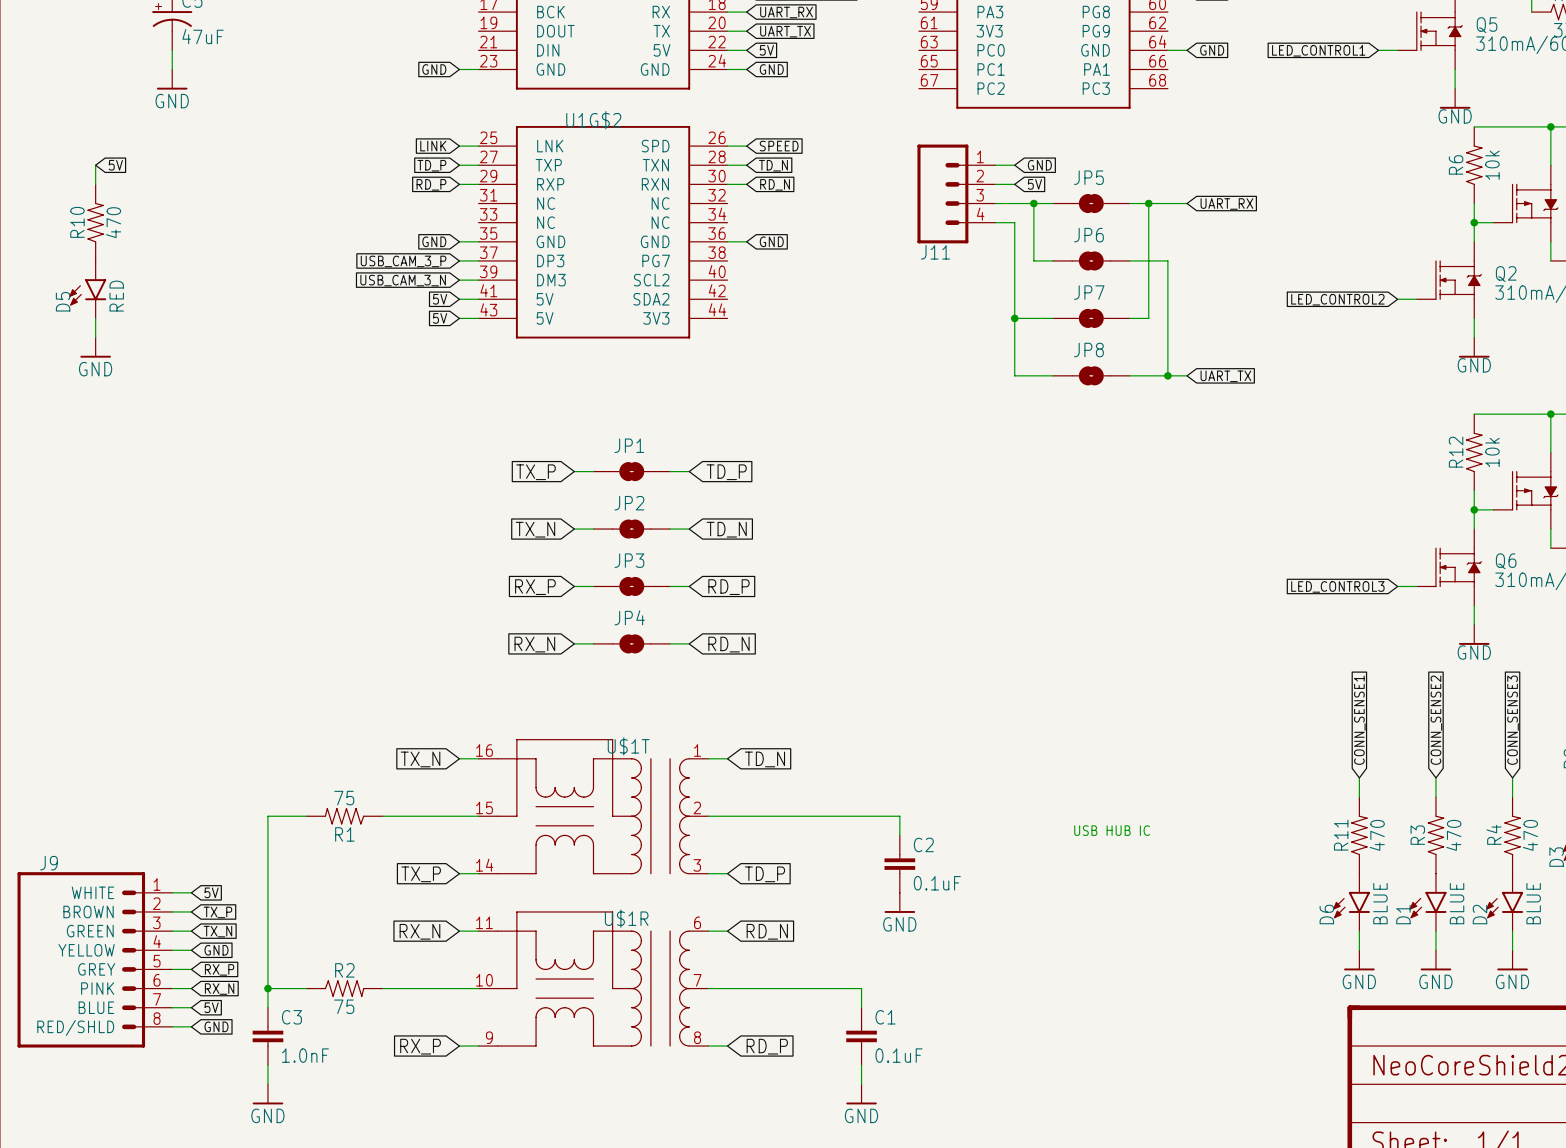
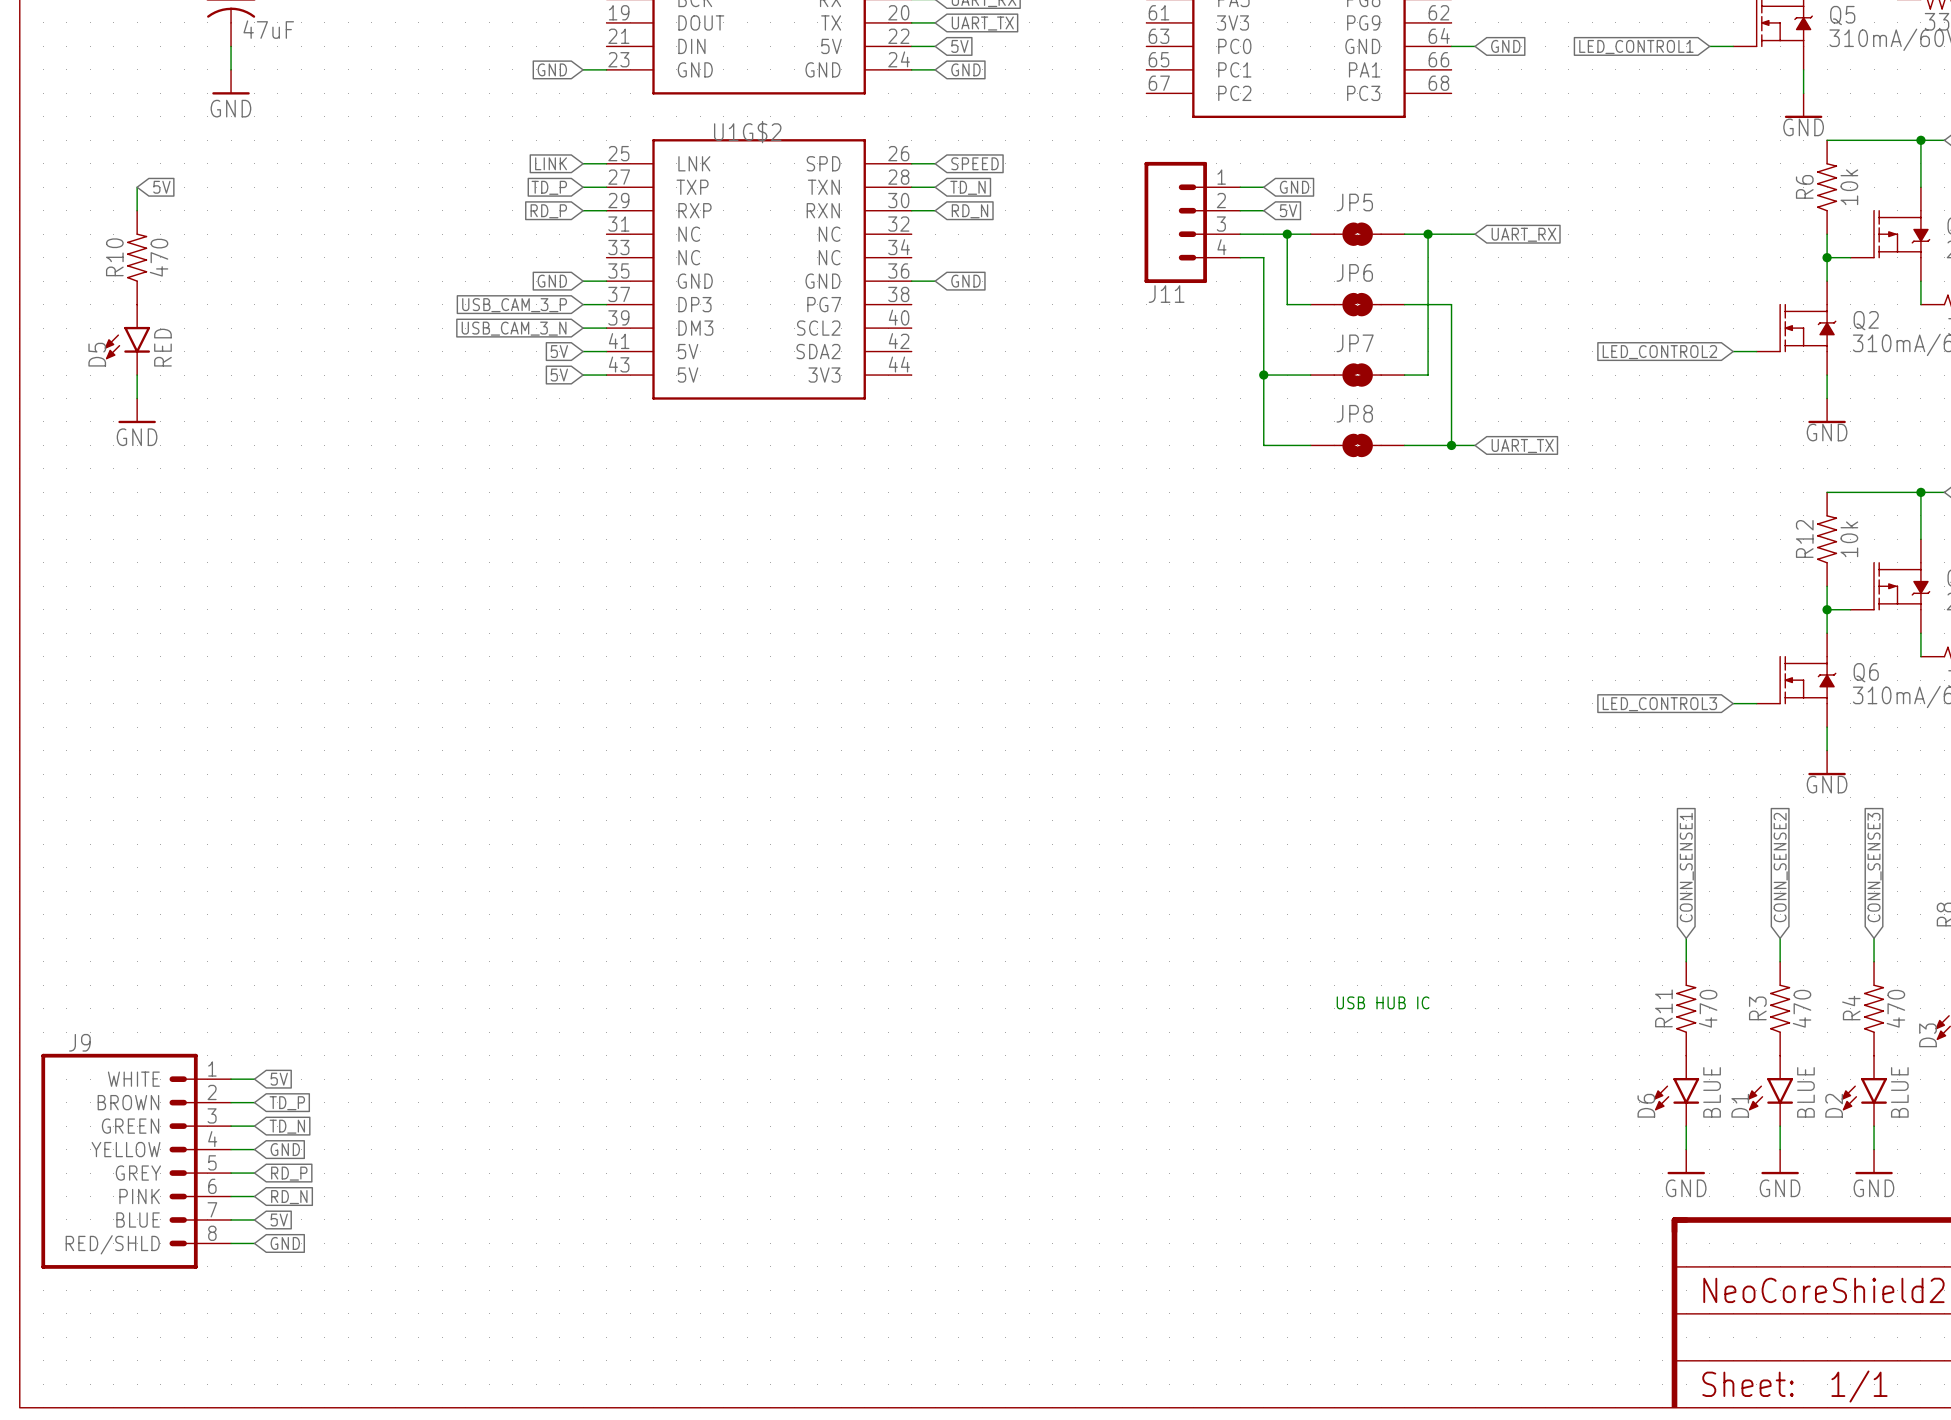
wire: (574, 471) (593, 471) -> none
JP1: (631, 471) -> none
wire: (670, 471) (689, 471) -> none
global label: TX_P (536, 472) -> none
global label: TD_P (726, 472) -> none
global label: TX_N (535, 529) -> none
wire: (574, 529) (593, 529) -> none
JP2: (631, 529) -> none
wire: (670, 529) (689, 529) -> none
global label: TD_N (726, 529) -> none
wire: (574, 586) (593, 586) -> none
JP3: (631, 586) -> none
wire: (670, 586) (689, 586) -> none
global label: RX_P (535, 587) -> none
global label: RD_P (728, 587) -> none
wire: (574, 643) (593, 643) -> none
JP4: (631, 643) -> none
wire: (670, 643) (689, 643) -> none
global label: RX_N (534, 644) -> none
global label: RD_N (728, 644) -> none
wire: (459, 758) (478, 758) -> none
wire: (708, 758) (727, 758) -> none
global label: TX_N (420, 759) -> none
global label: TD_N (764, 759) -> none
U$1T: (593, 806) -> none
wire: (306, 816) (267, 816) (267, 1007) -> none
R1: 75 (344, 816) -> none
wire: (382, 816) (478, 816) -> none
wire: (708, 816) (899, 816) (899, 835) -> none
C2: 0.1uF (899, 864) -> none
wire: (459, 873) (478, 873) -> none
wire: (708, 873) (727, 873) -> none
global label: TX_P (421, 874) -> none
global label: TD_P (764, 874) -> none
power symbol: GND (899, 902) -> none
global label: TX_P (217, 912) -> TD_P (287, 1103)
global label: TX_N (217, 931) -> TD_N (287, 1126)
global label: RX_N (419, 931) -> none
wire: (459, 931) (478, 931) -> none
wire: (708, 931) (727, 931) -> none
global label: RD_N (767, 931) -> none
global label: RX_P (219, 969) -> RD_P (289, 1173)
U$1R: (593, 979) -> none
wire: (267, 988) (306, 988) -> none
junction: (267, 988) -> none
R2: 75 (344, 988) -> none
wire: (382, 988) (478, 988) -> none
wire: (708, 988) (861, 988) (861, 1007) -> none
global label: RX_N (219, 989) -> RD_N (289, 1197)
C3: 1.0nF (267, 1036) -> none
C1: 0.1uF (861, 1036) -> none
global label: RX_P (420, 1046) -> none
wire: (459, 1046) (478, 1046) -> none
wire: (708, 1046) (727, 1046) -> none
global label: RD_P (767, 1046) -> none
wire: (267, 1065) (267, 1084) -> none
wire: (861, 1065) (861, 1084) -> none
power symbol: GND (267, 1094) -> none
power symbol: GND (861, 1094) -> none

